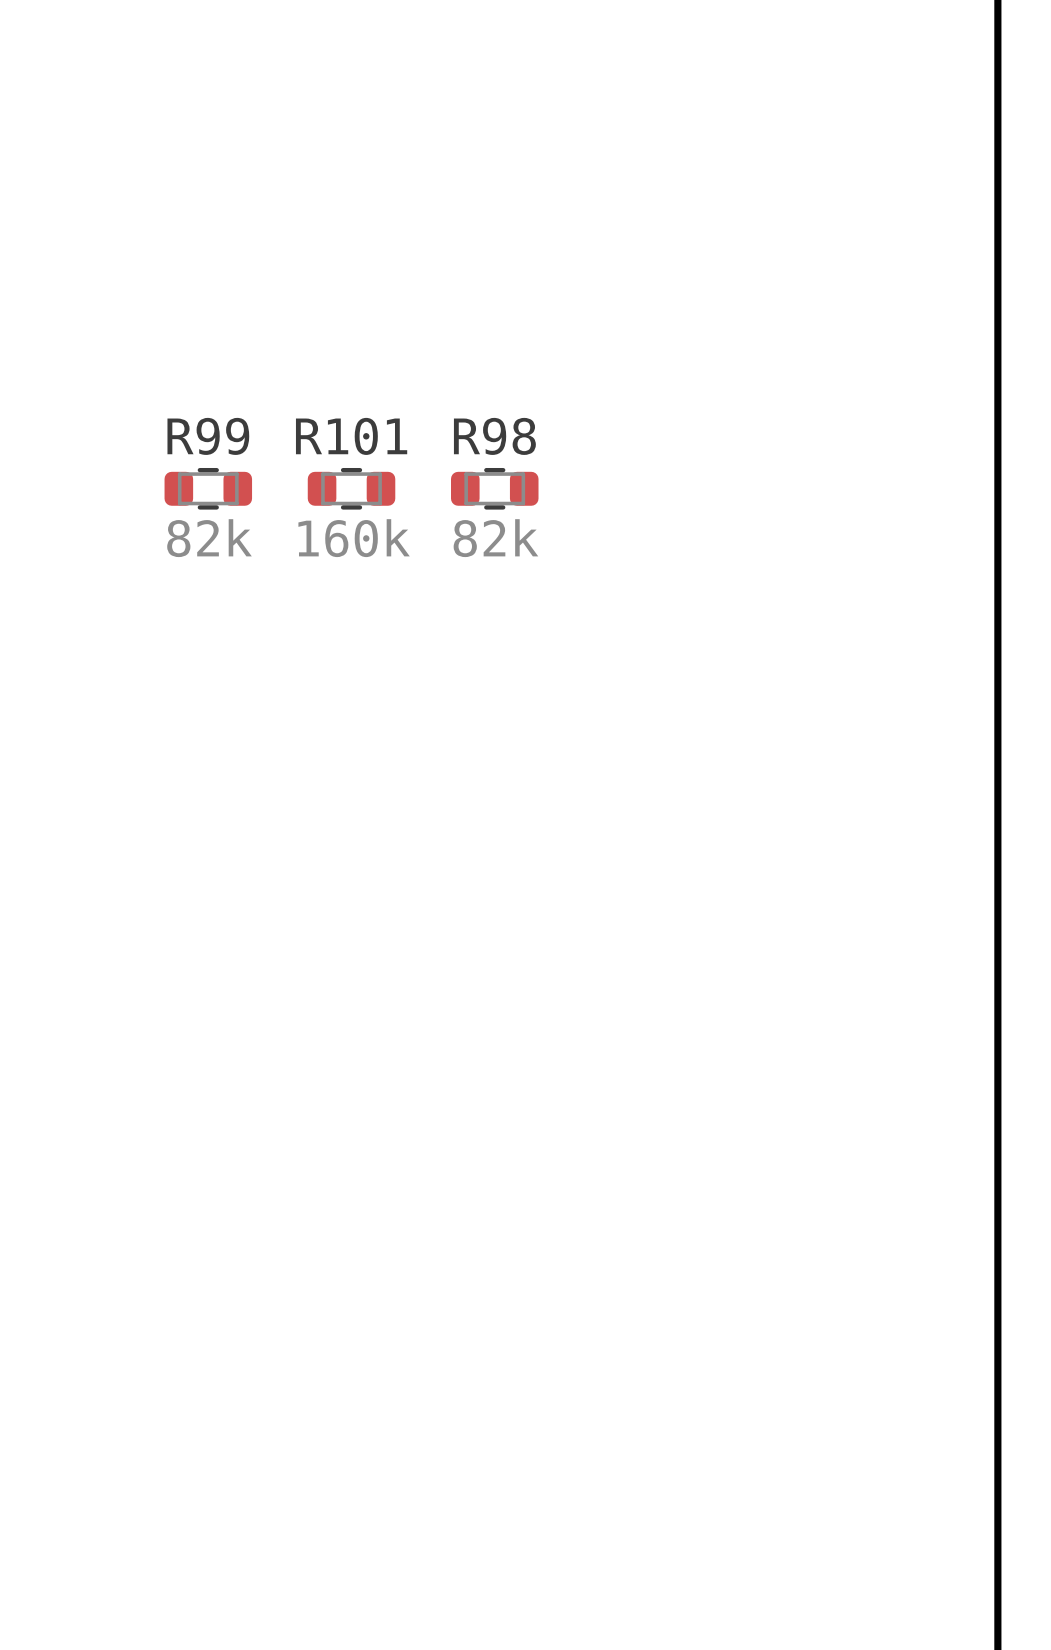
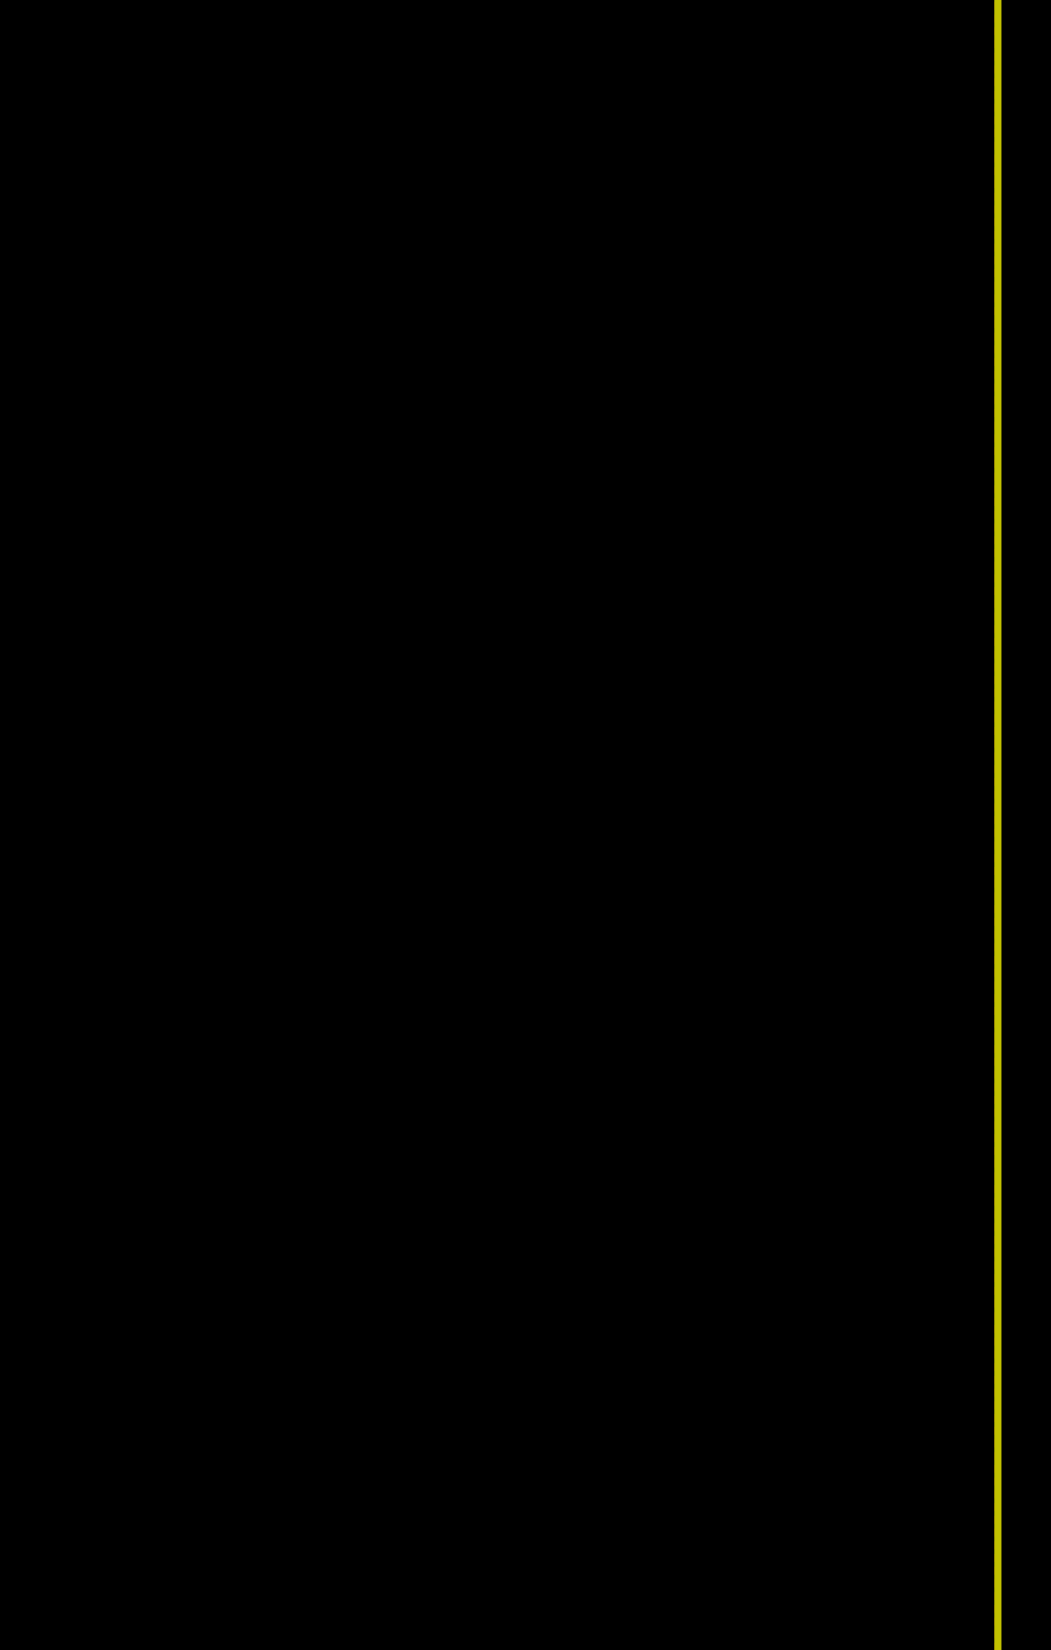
R99: 82k (208, 488) -> none
R101: 160k (351, 488) -> none
R98: 82k (494, 488) -> none

